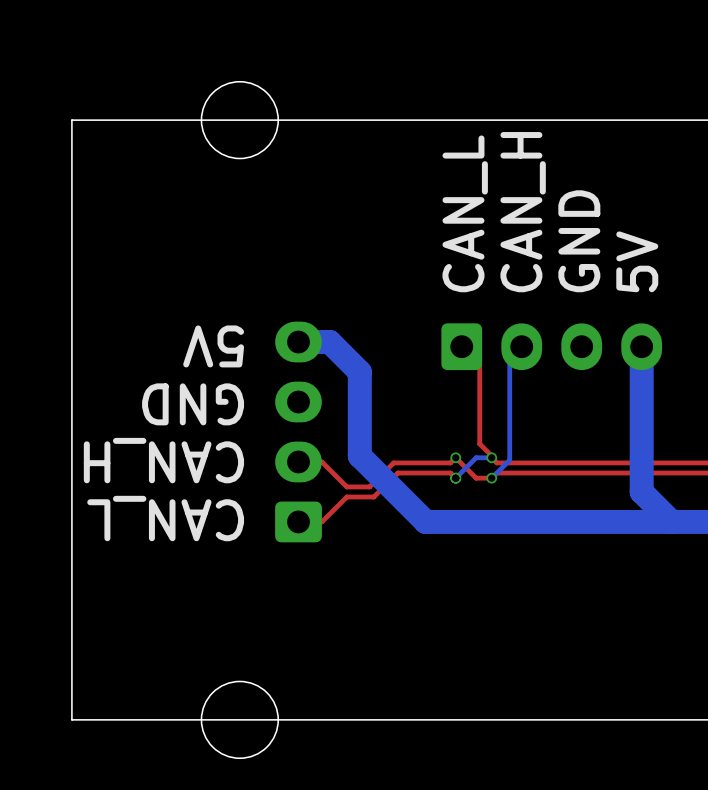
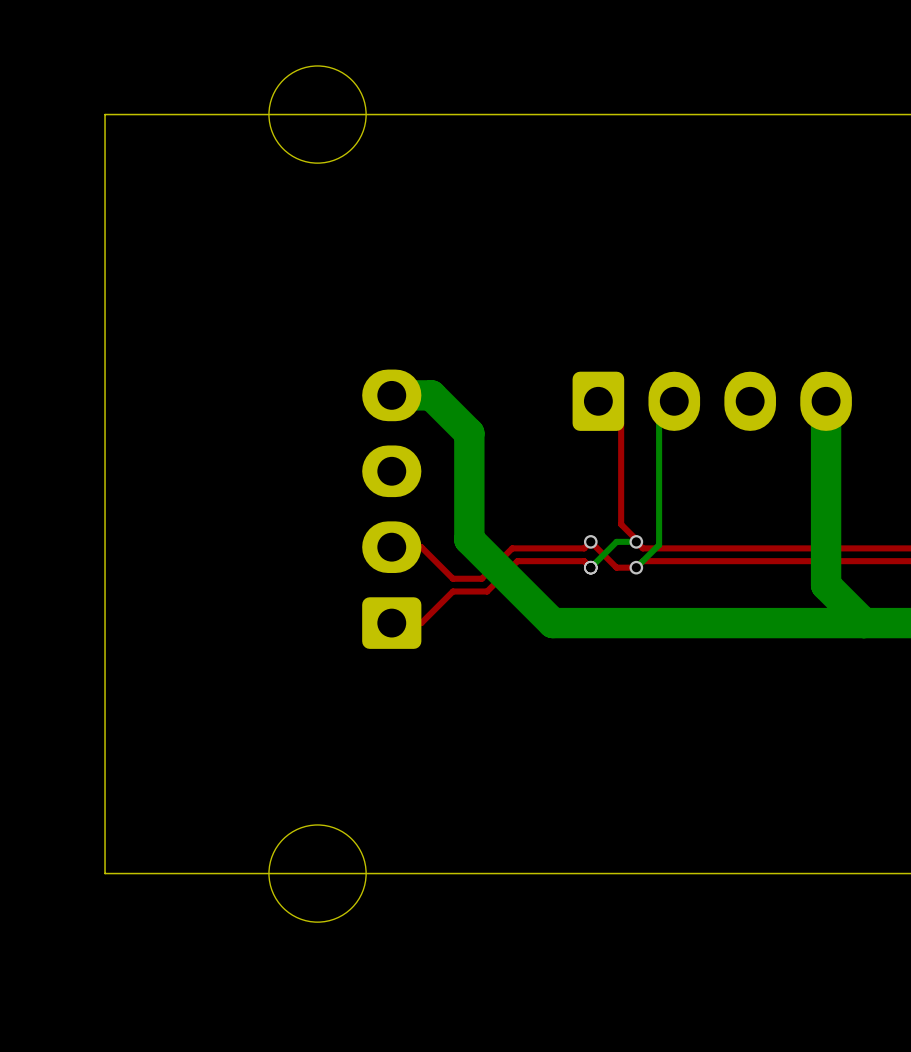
text: CAN_H (523, 212) -> none
text: CAN_L (465, 213) -> none
text: GND (579, 241) -> none
text: 5V (637, 261) -> none
text: 5V (213, 346) -> none
text: GND (193, 404) -> none
text: CAN_H (163, 460) -> none
text: CAN_L (165, 518) -> none

